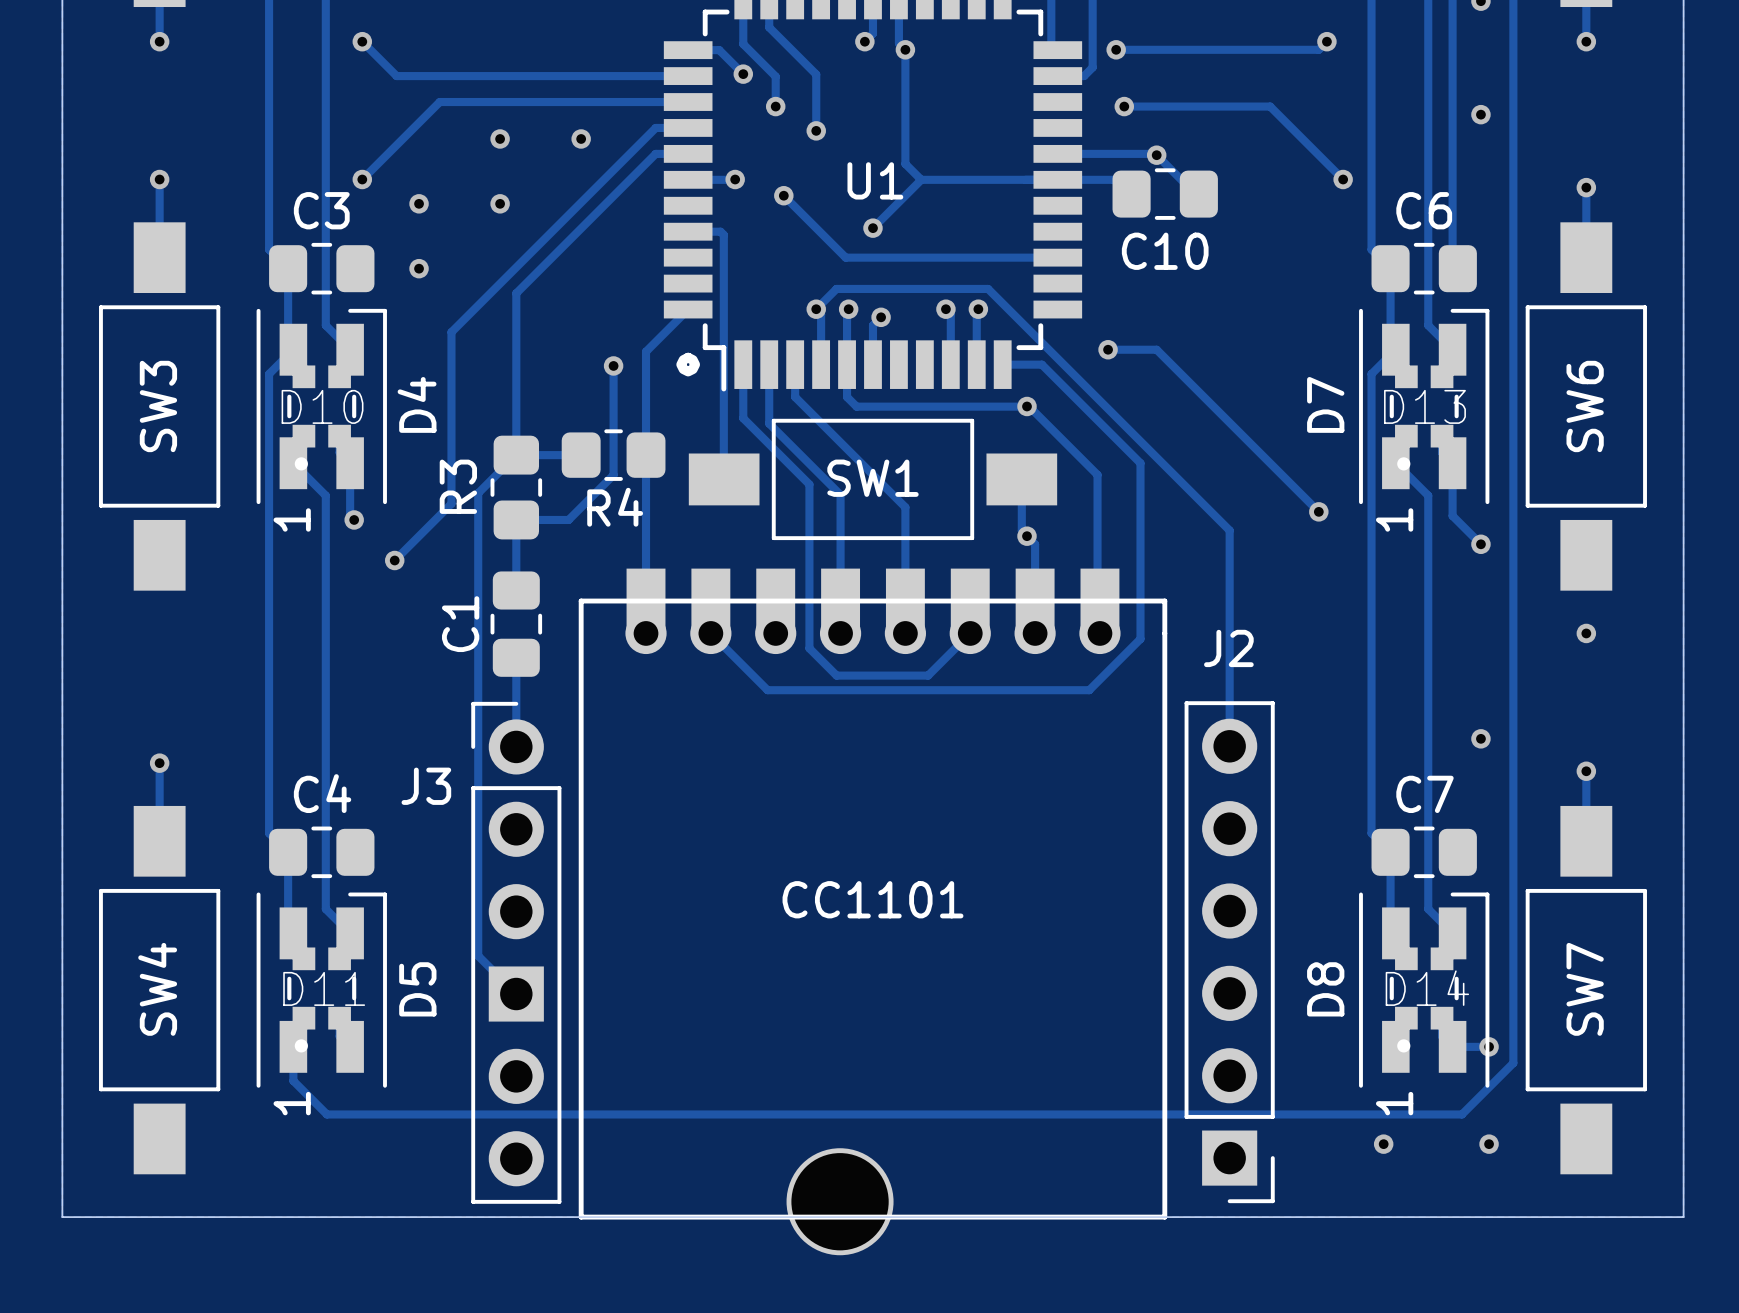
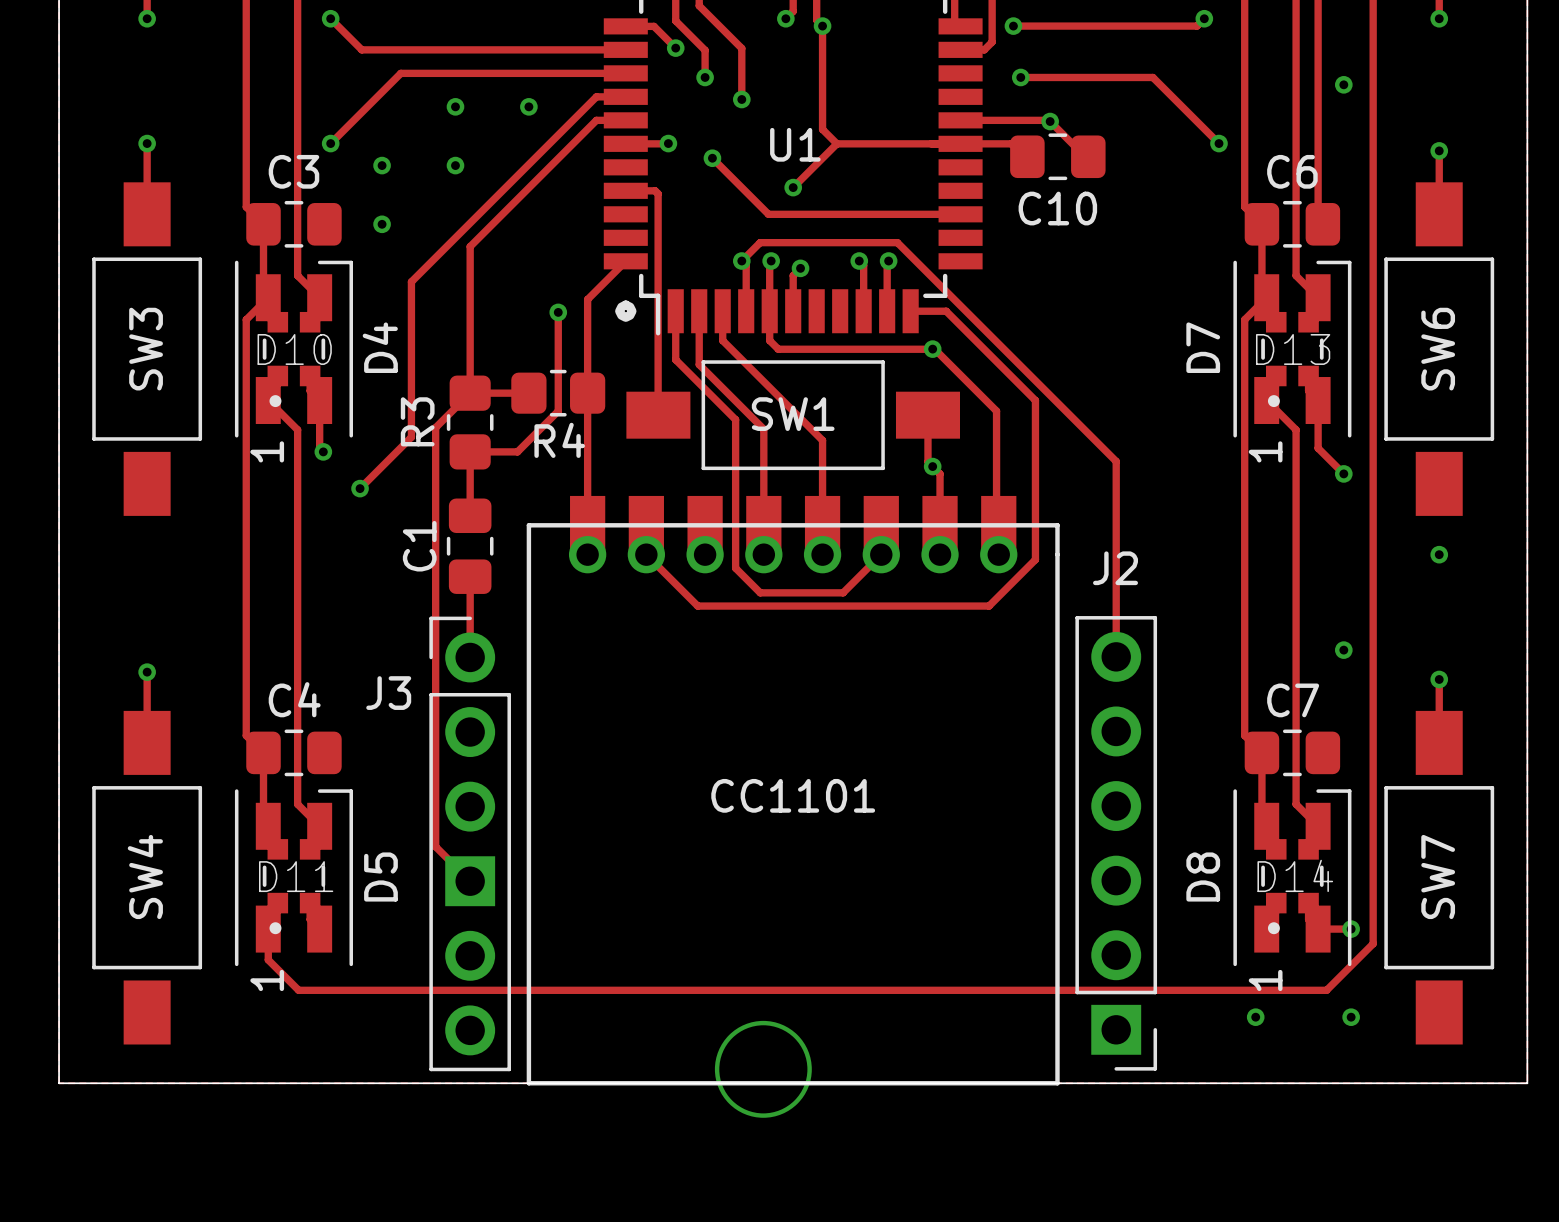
track: (1108, 349) (1156, 349) (1318, 511) -> none
via: (1108, 349) -> none
via: (1318, 511) -> none

